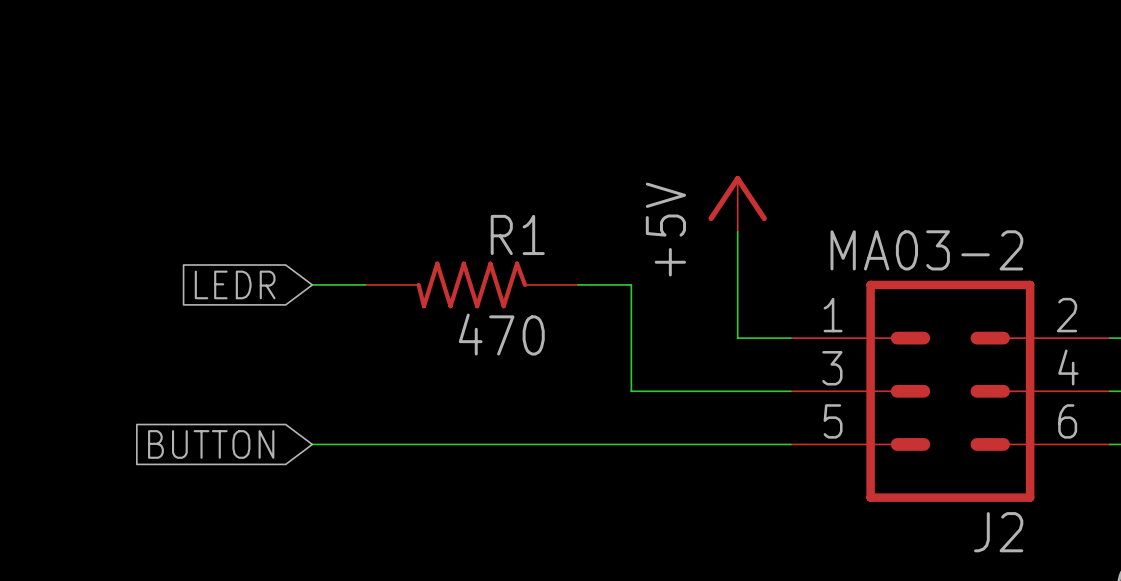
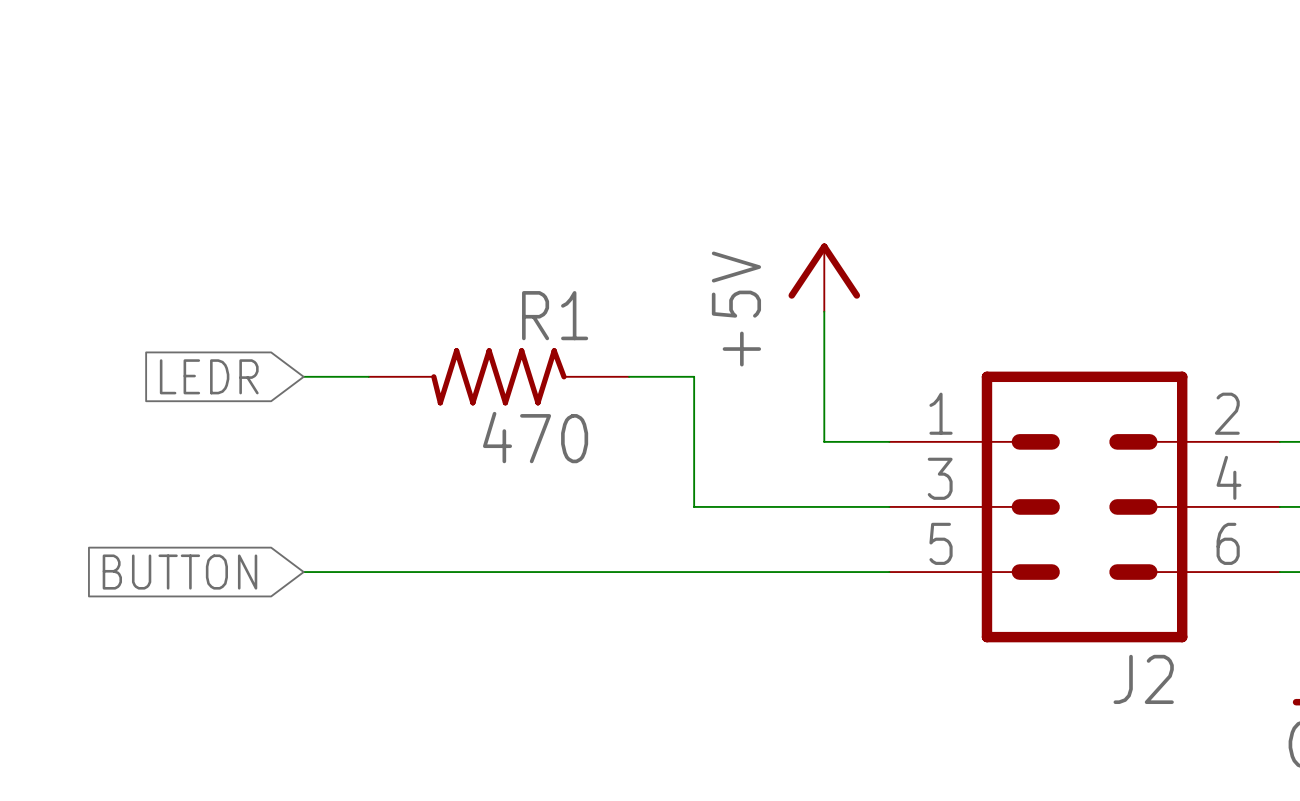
J2 value: MA03-2 (926, 250) -> none

